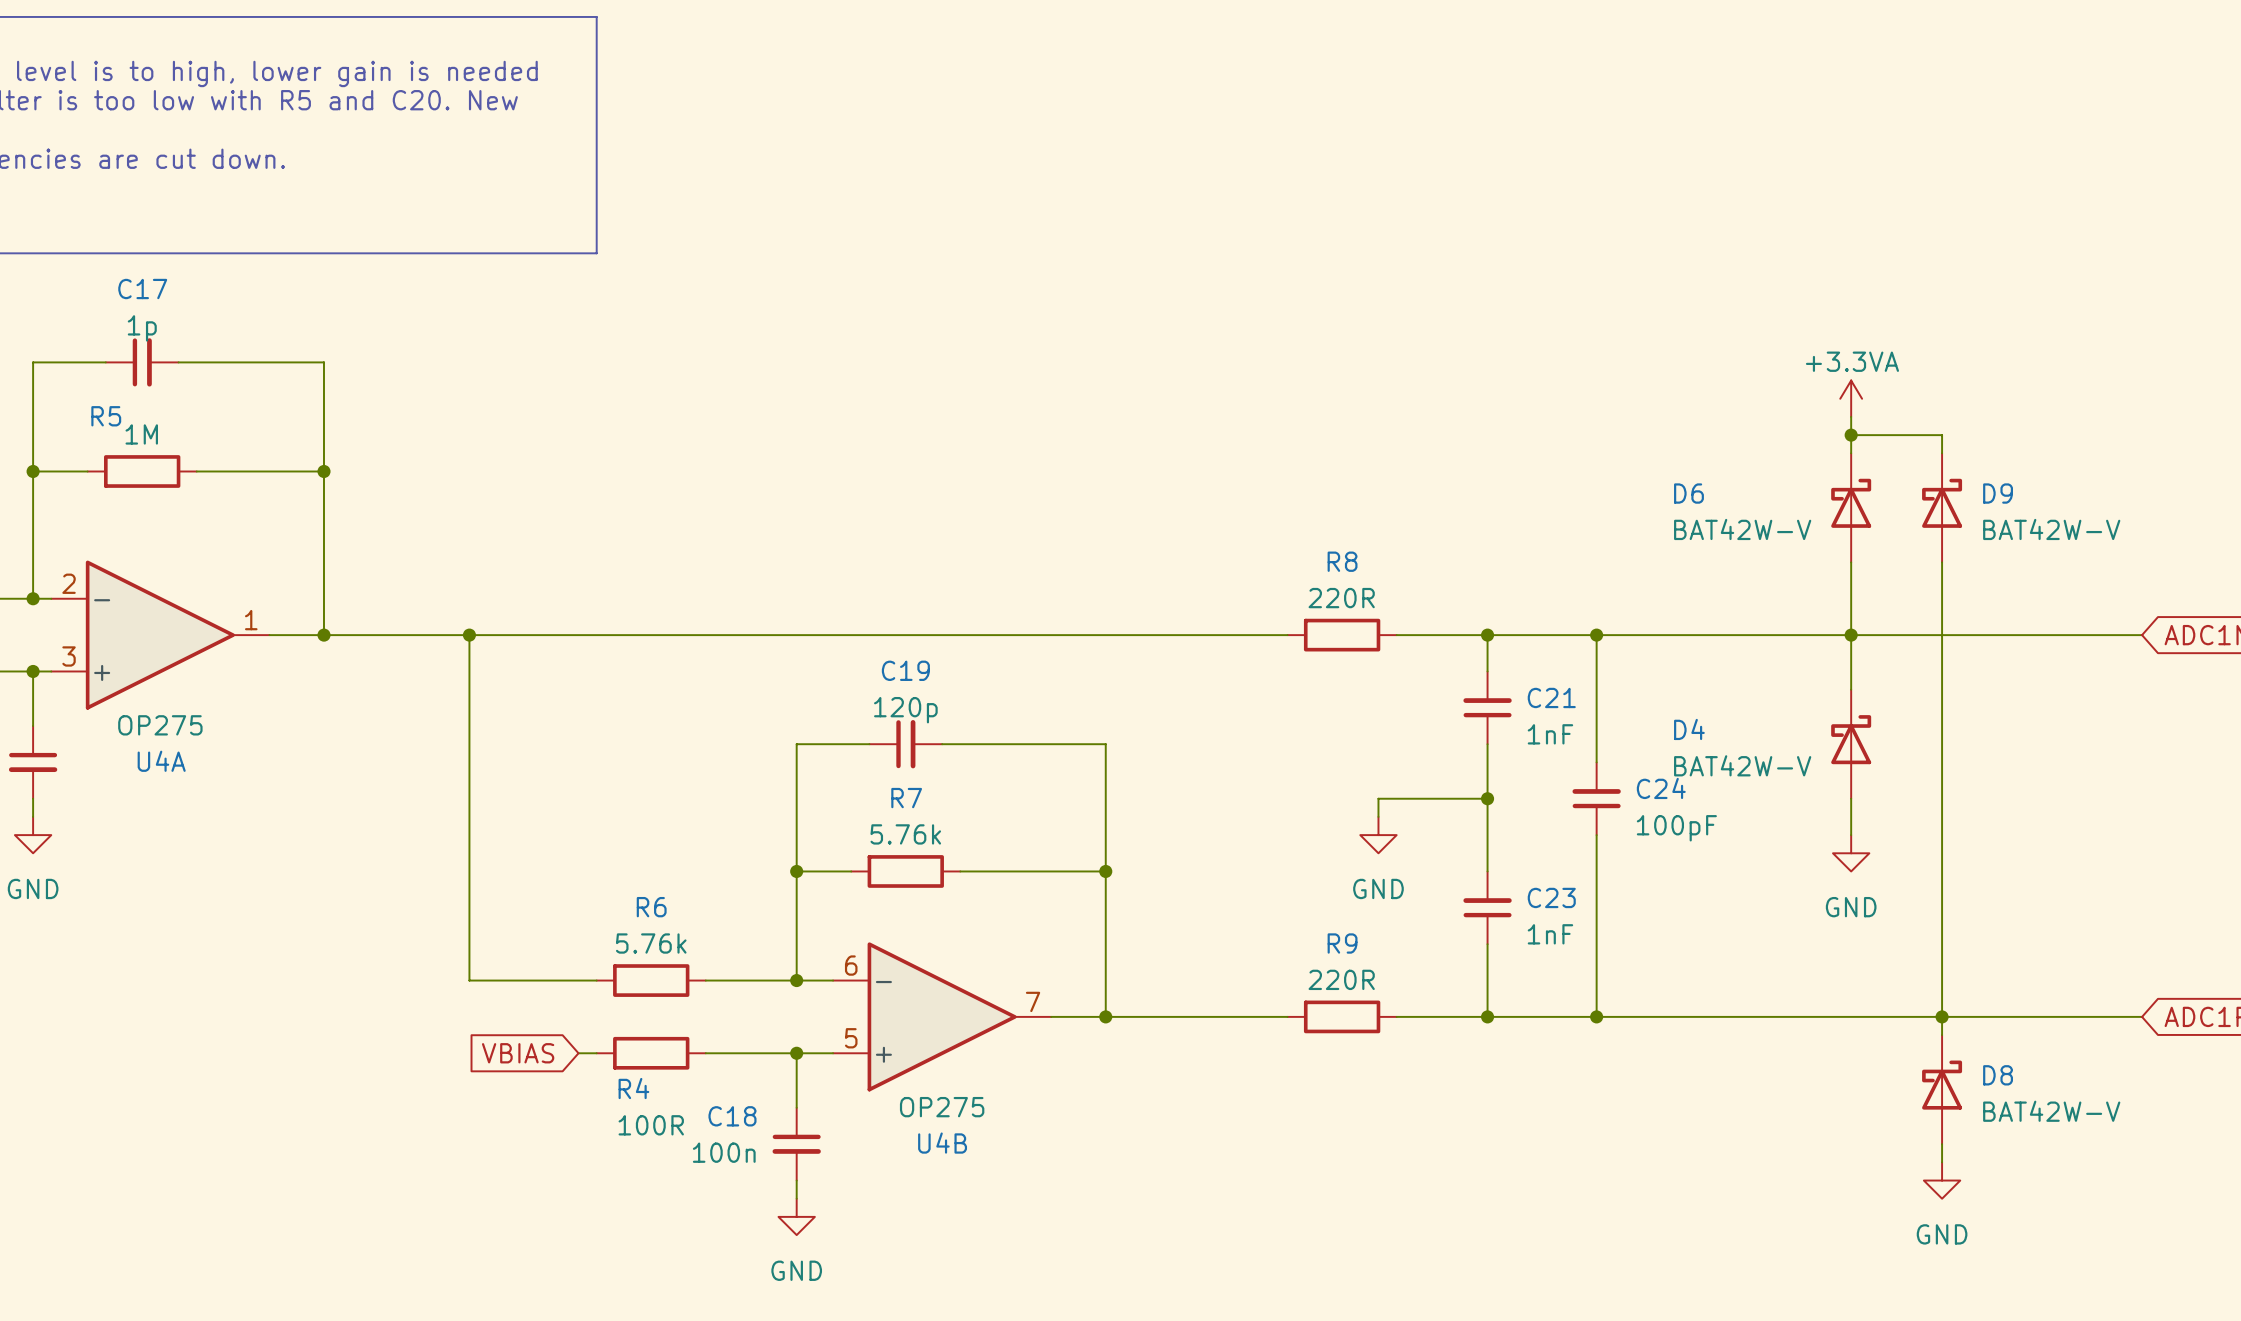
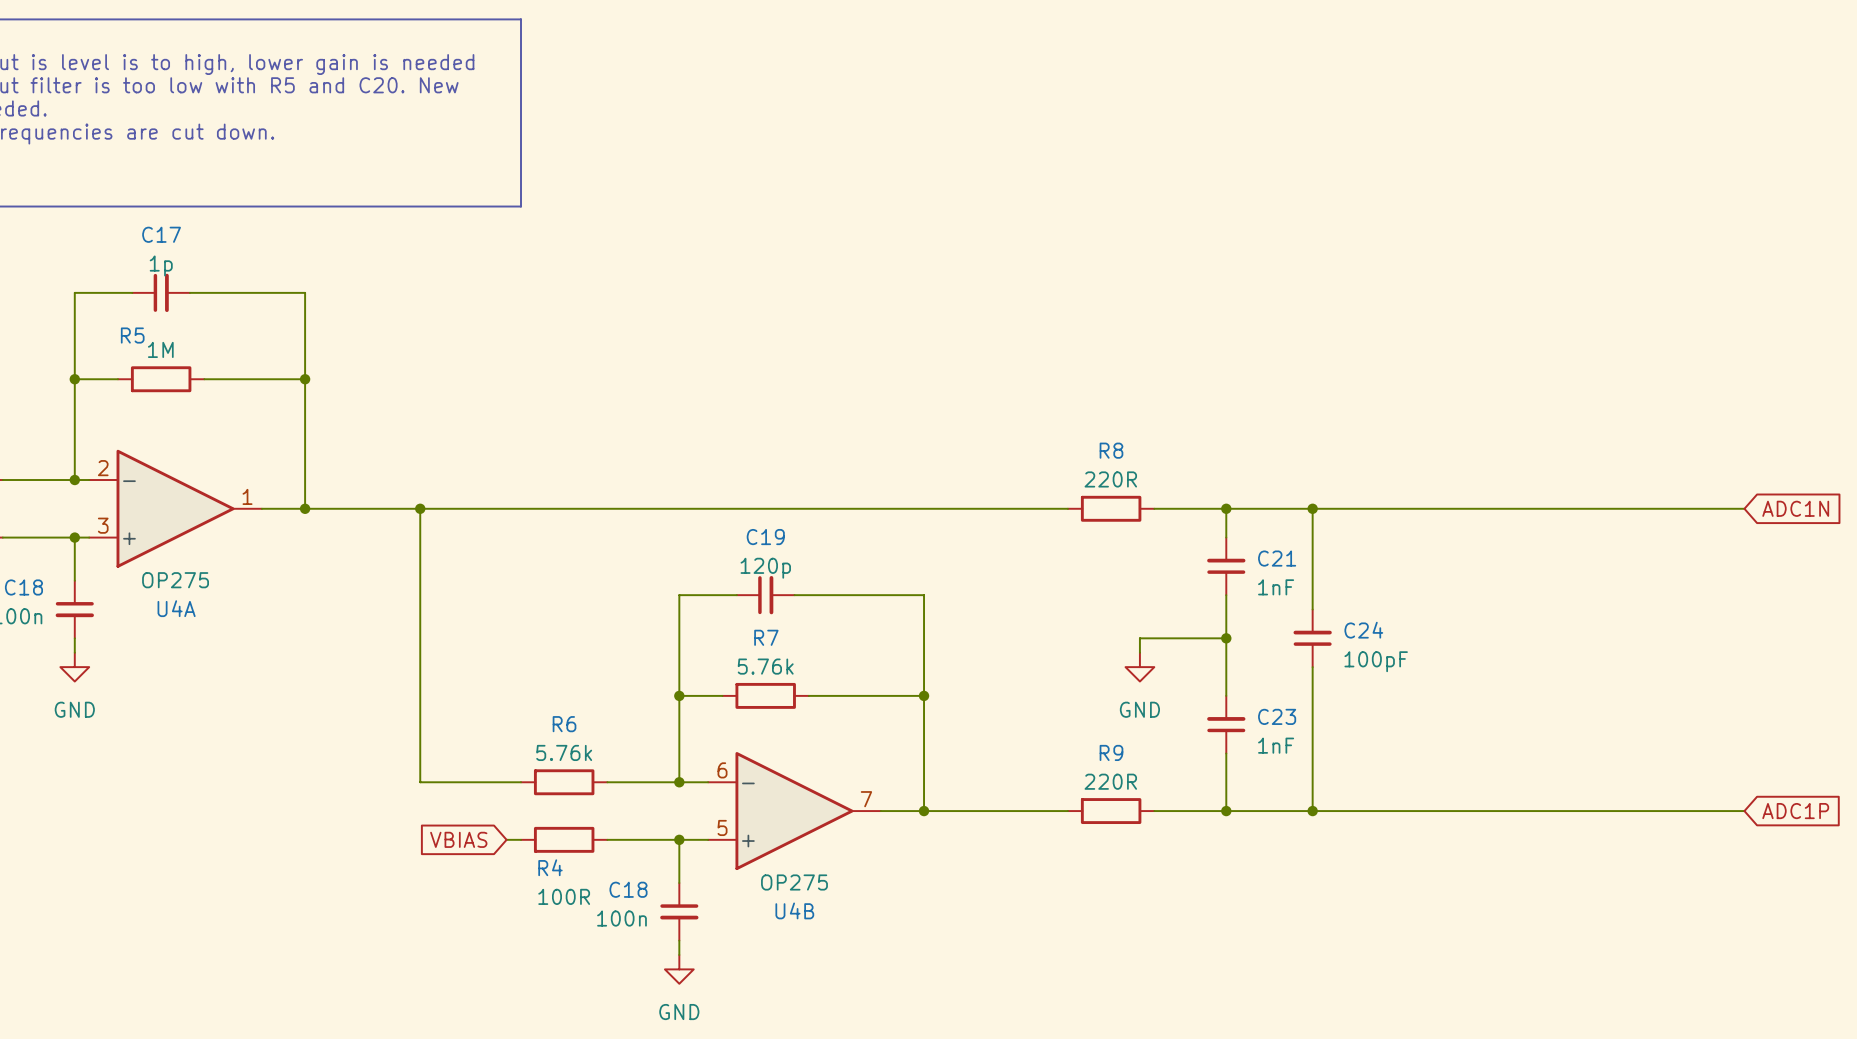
power symbol: +3.3VA (1851, 398) -> none
wire: (1851, 416) (1851, 453) -> none
wire: (1851, 435) (1942, 435) (1942, 453) -> none
junction: (1851, 435) -> none
D6: BAT42W-V (1851, 507) -> none
D9: BAT42W-V (1942, 507) -> none
wire: (1851, 562) (1851, 689) -> none
wire: (1942, 562) (1942, 1035) -> none
junction: (1851, 635) -> none
D4: BAT42W-V (1851, 744) -> none
wire: (1851, 798) (1851, 835) -> none
power symbol: GND (1851, 853) -> none
junction: (1942, 1016) -> none
D8: BAT42W-V (1942, 1089) -> none
wire: (1942, 1144) (1942, 1162) -> none
power symbol: GND (1942, 1180) -> none

